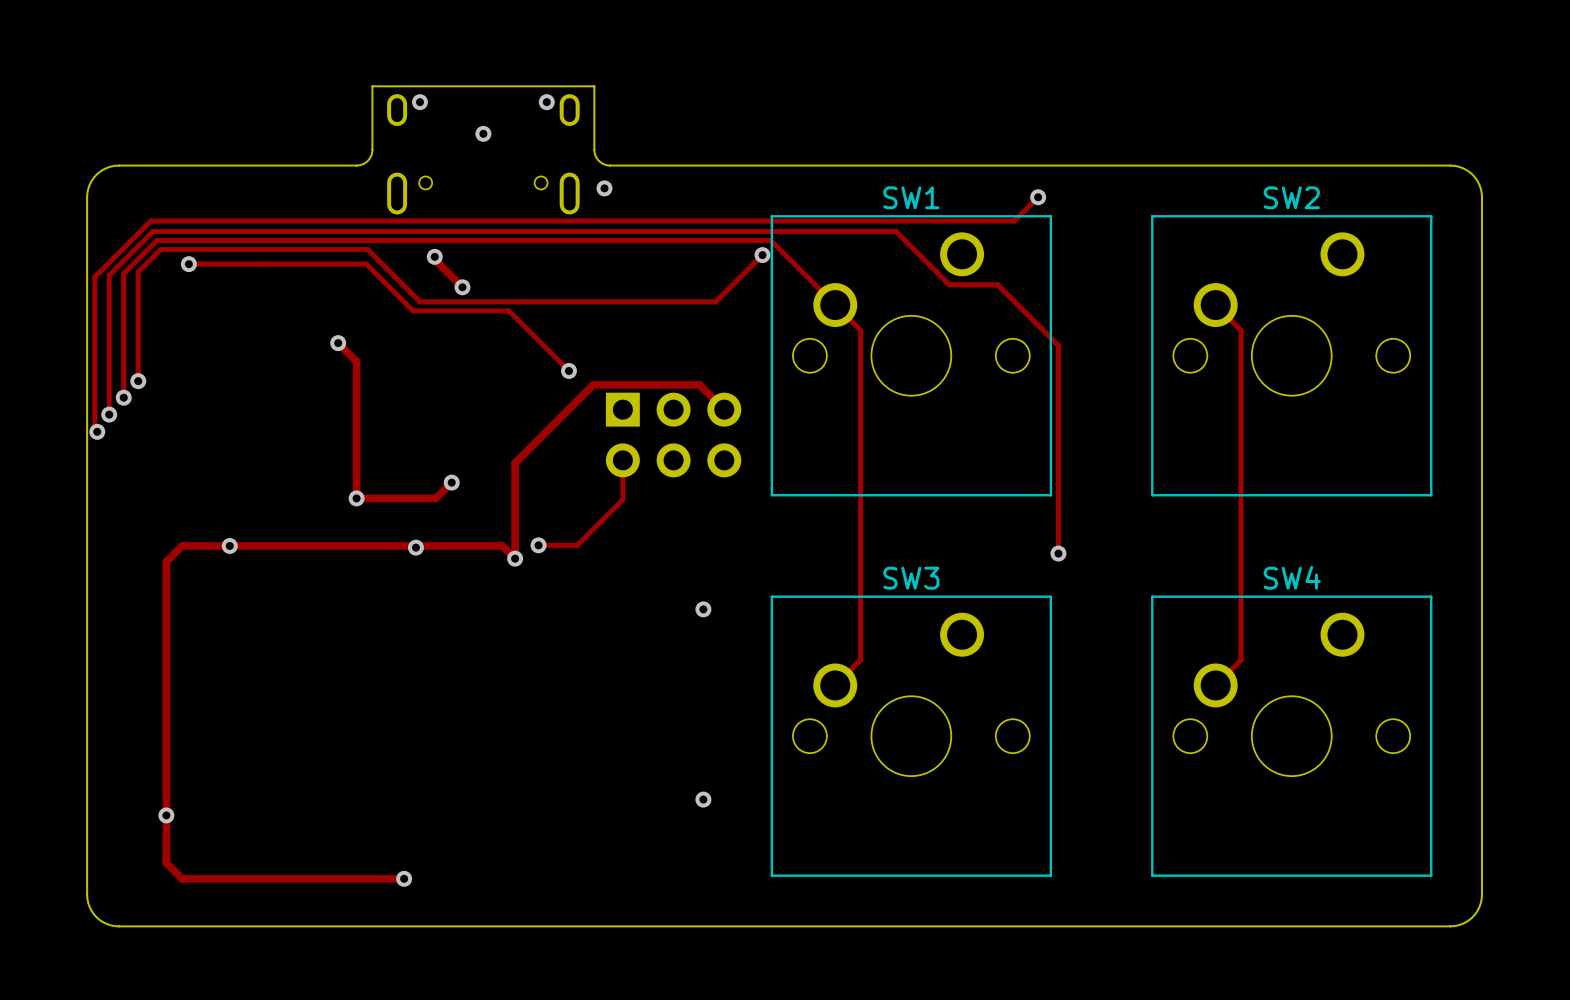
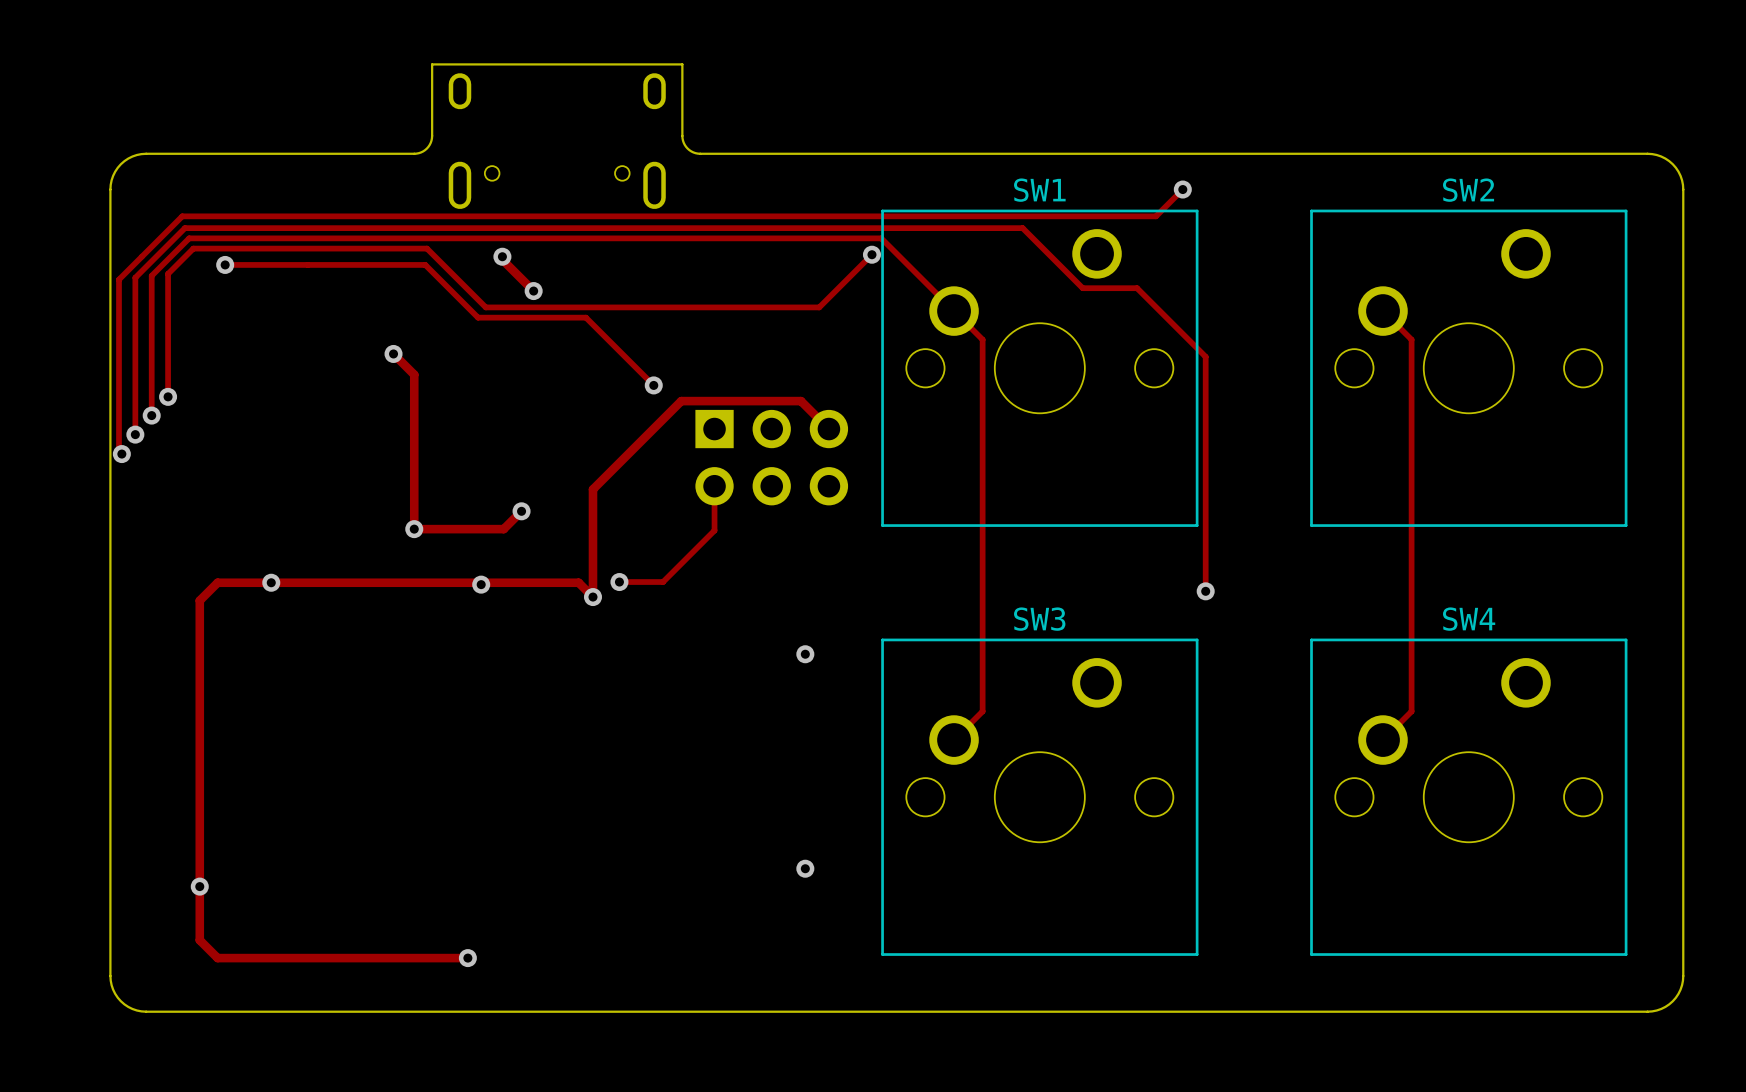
via: (419, 102) -> none
via: (546, 102) -> none
via: (483, 133) -> none
via: (604, 188) -> none

